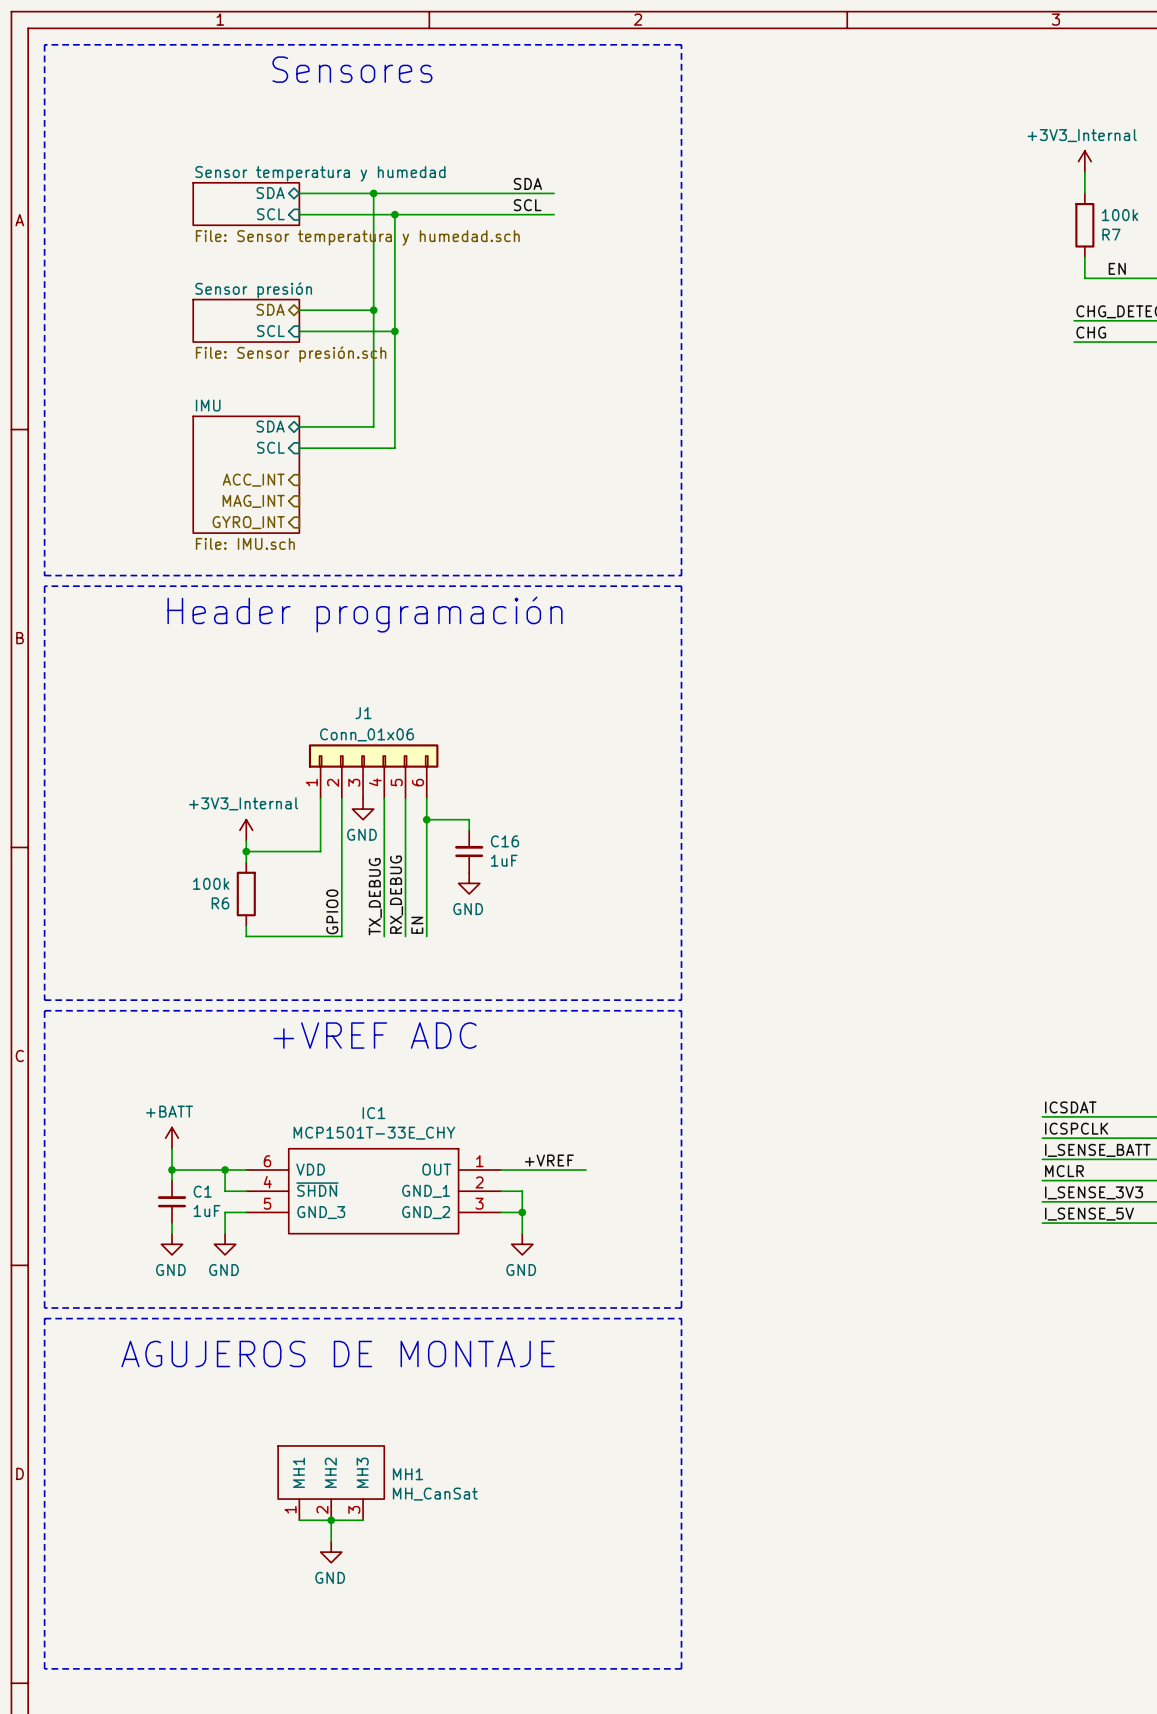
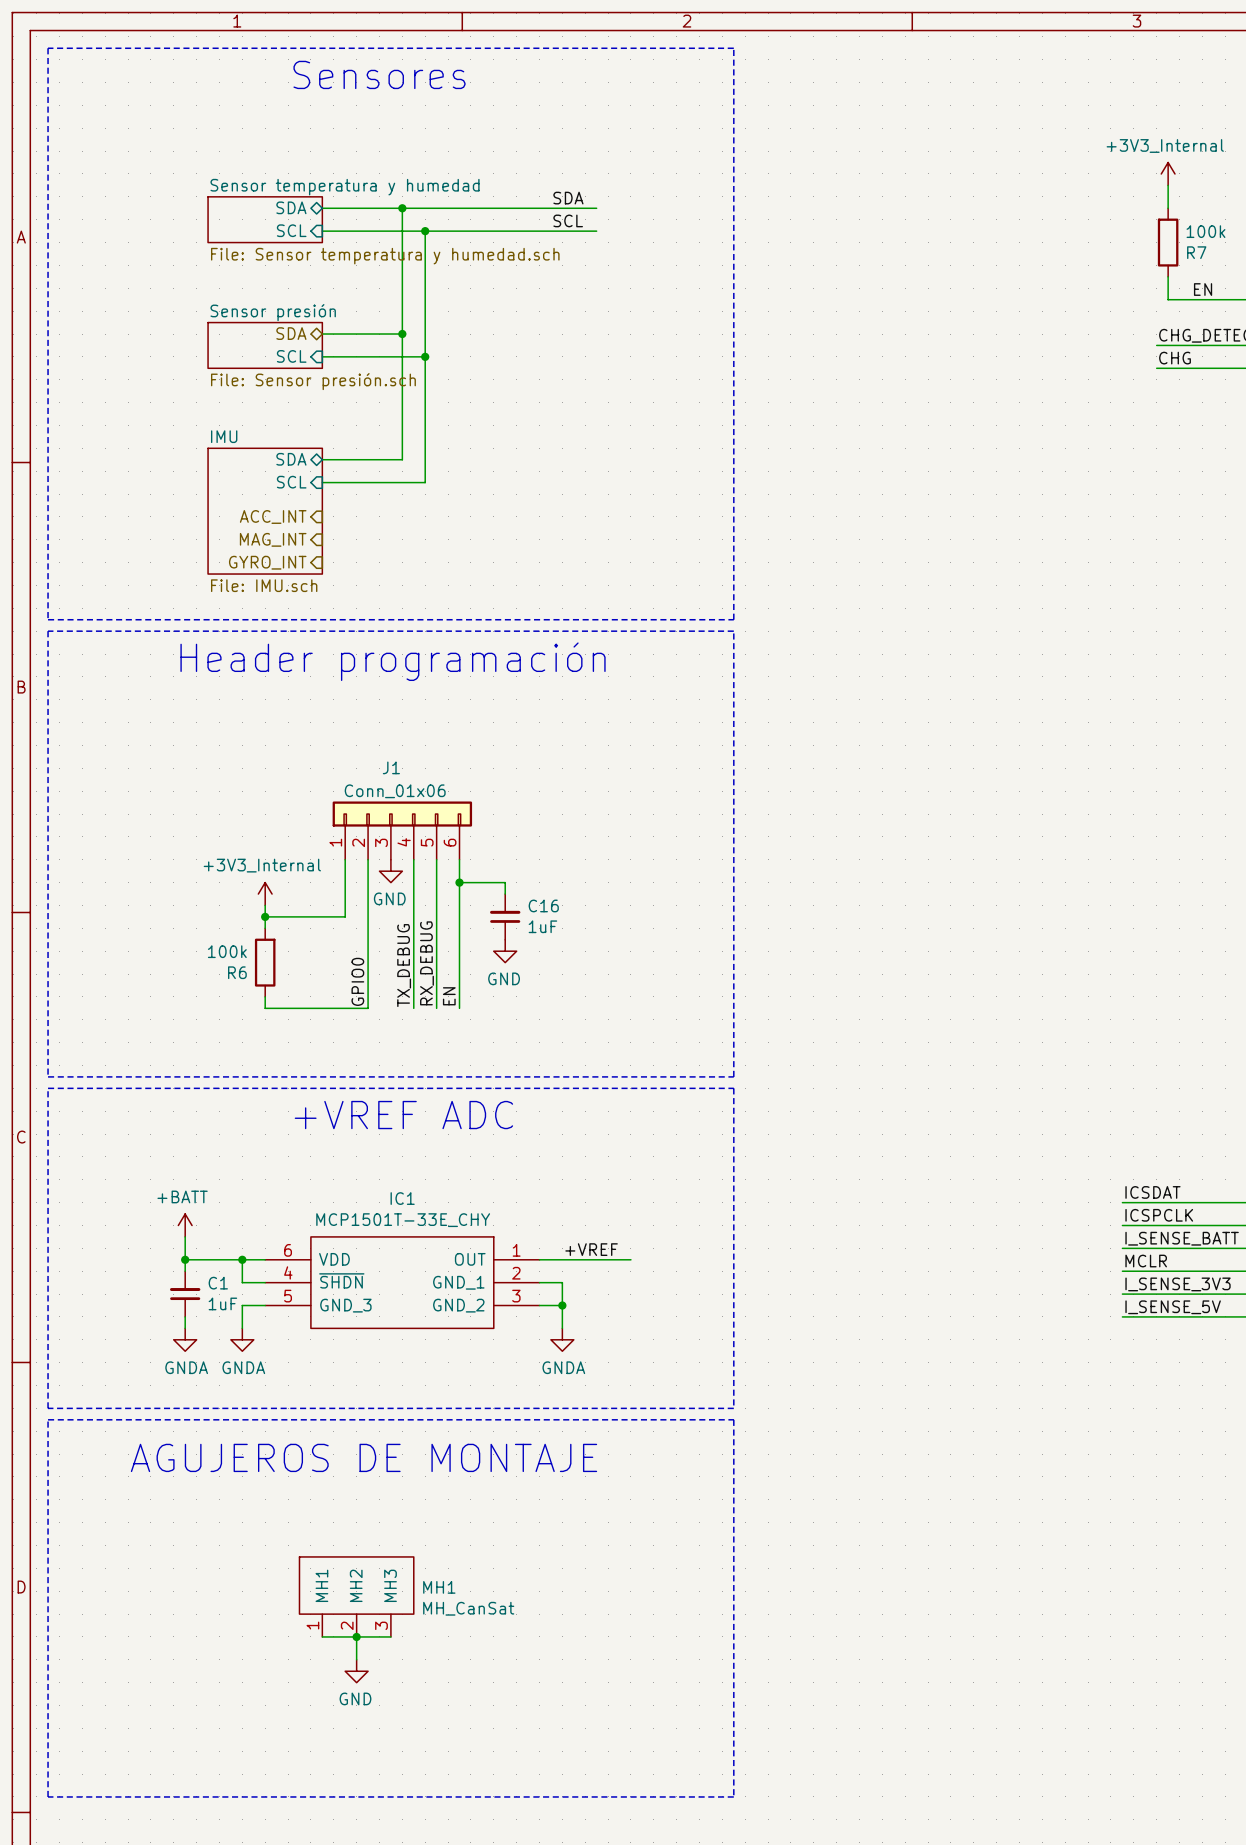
power symbol: GND (171, 1244) -> GNDA (185, 1339)
power symbol: GND (225, 1244) -> GNDA (242, 1339)
power symbol: GND (522, 1244) -> GNDA (562, 1339)

